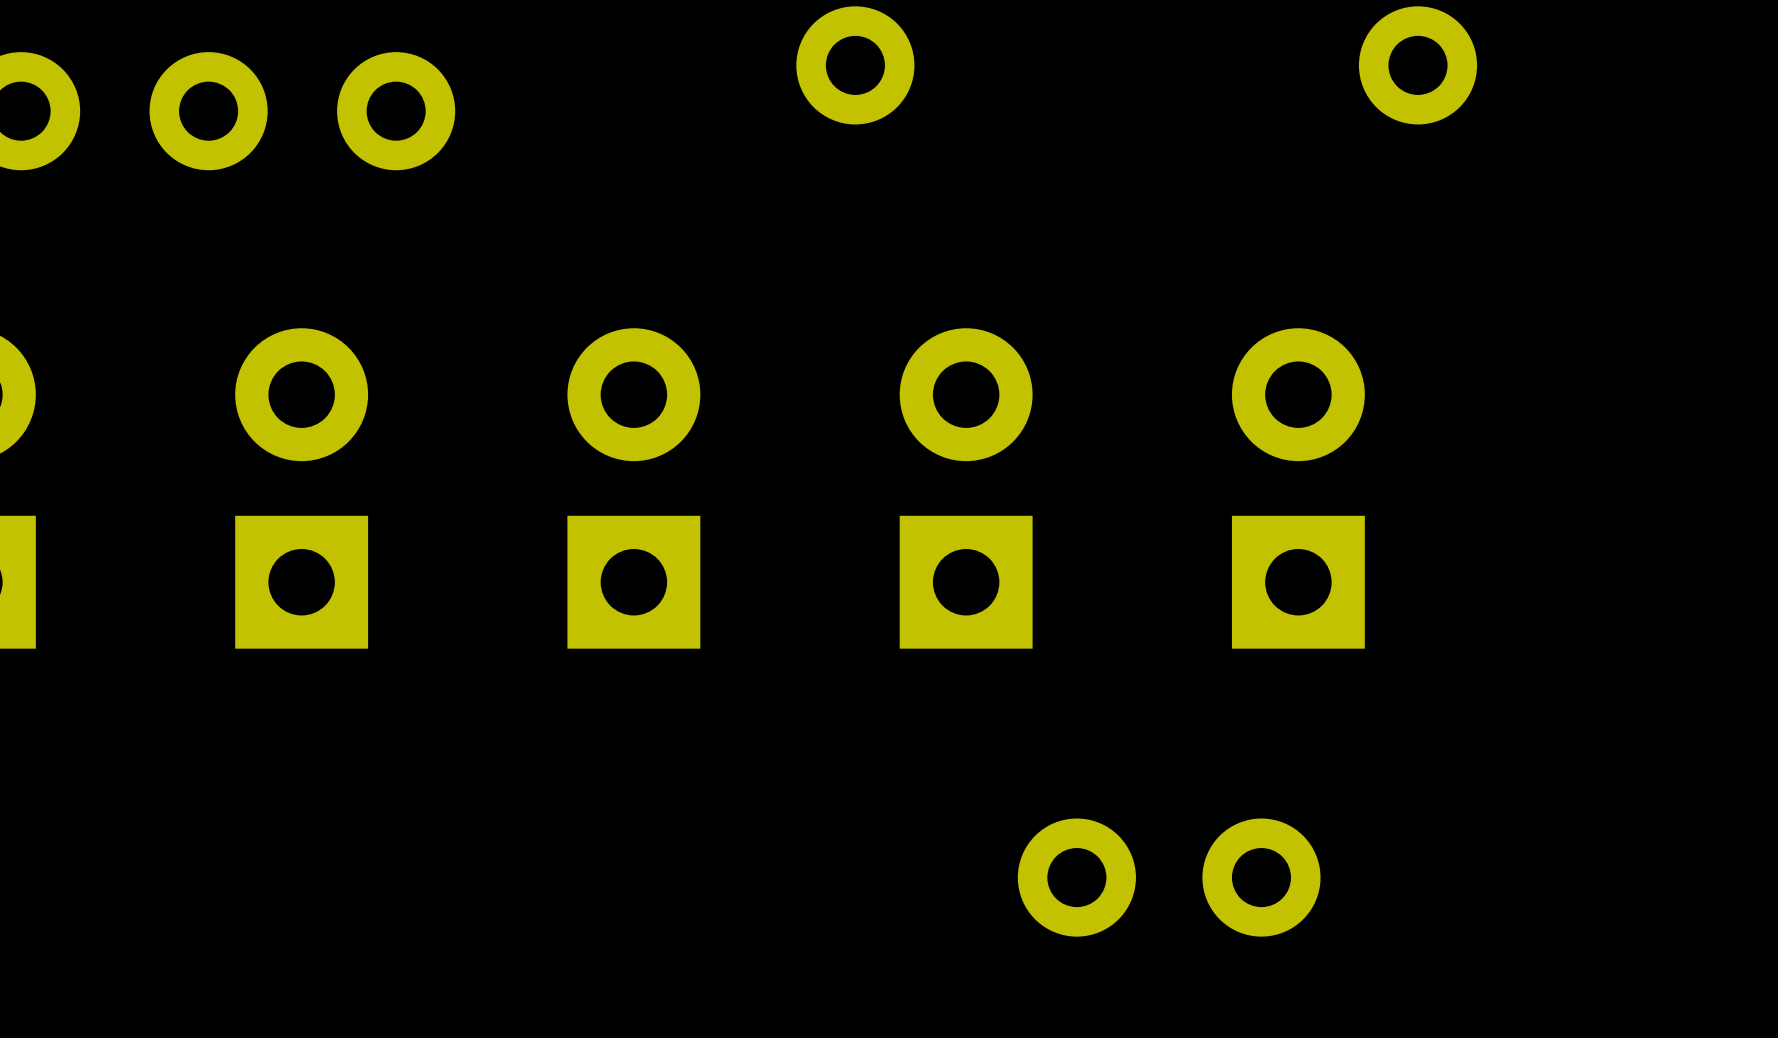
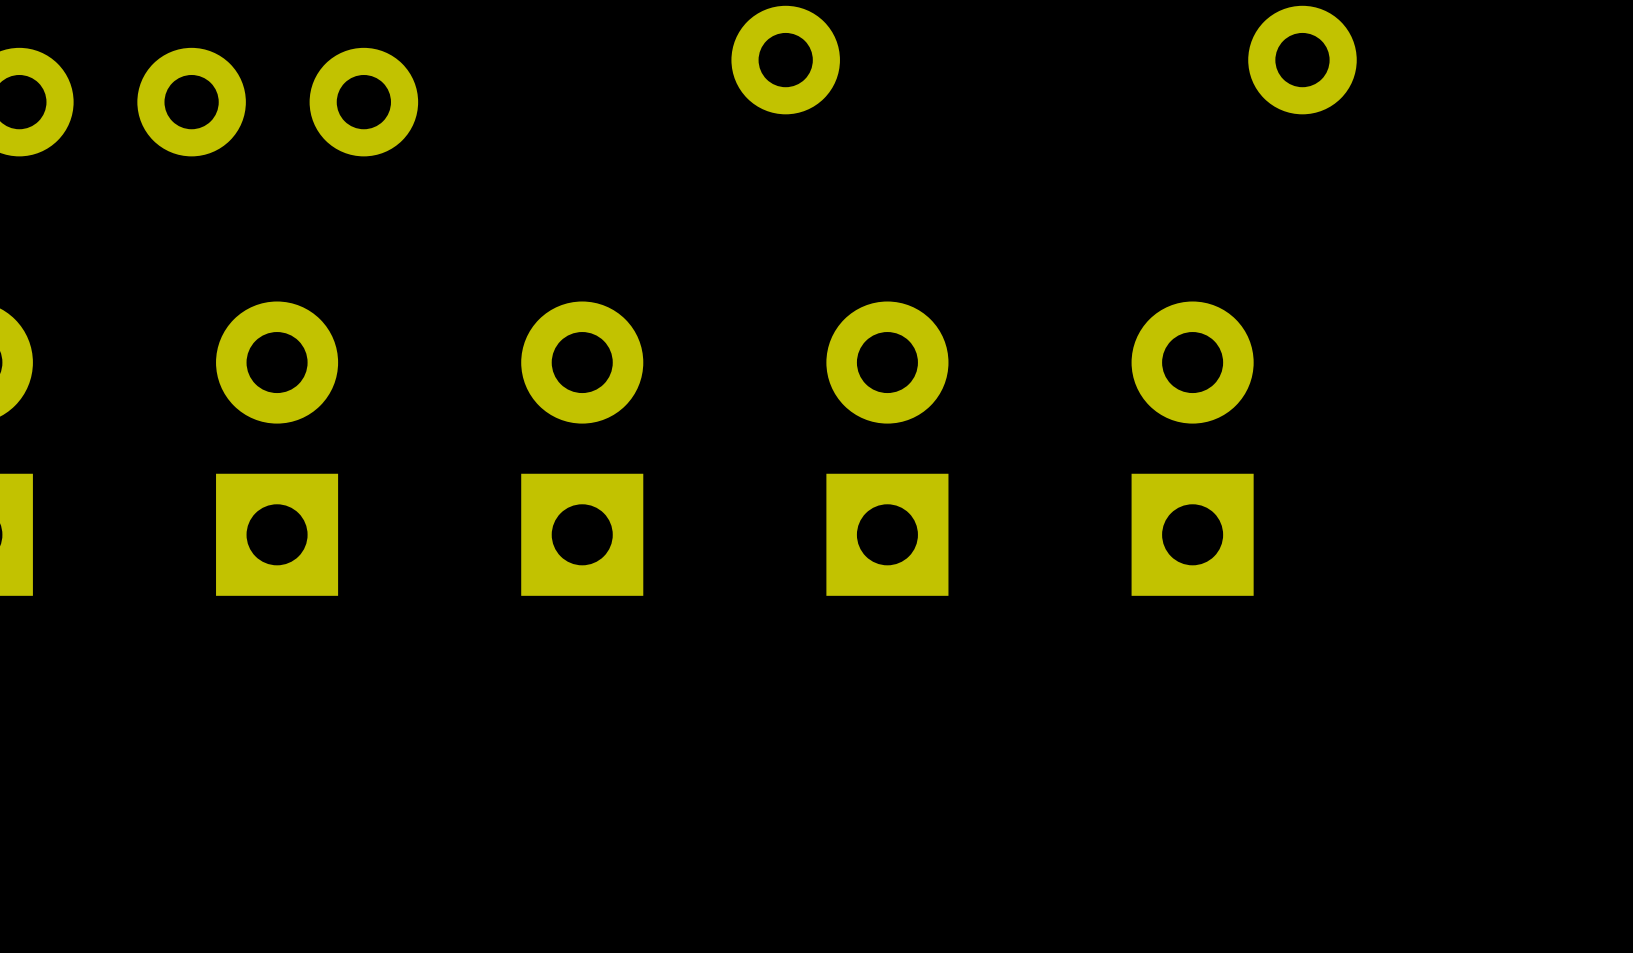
part: (1169, 877) -> none

